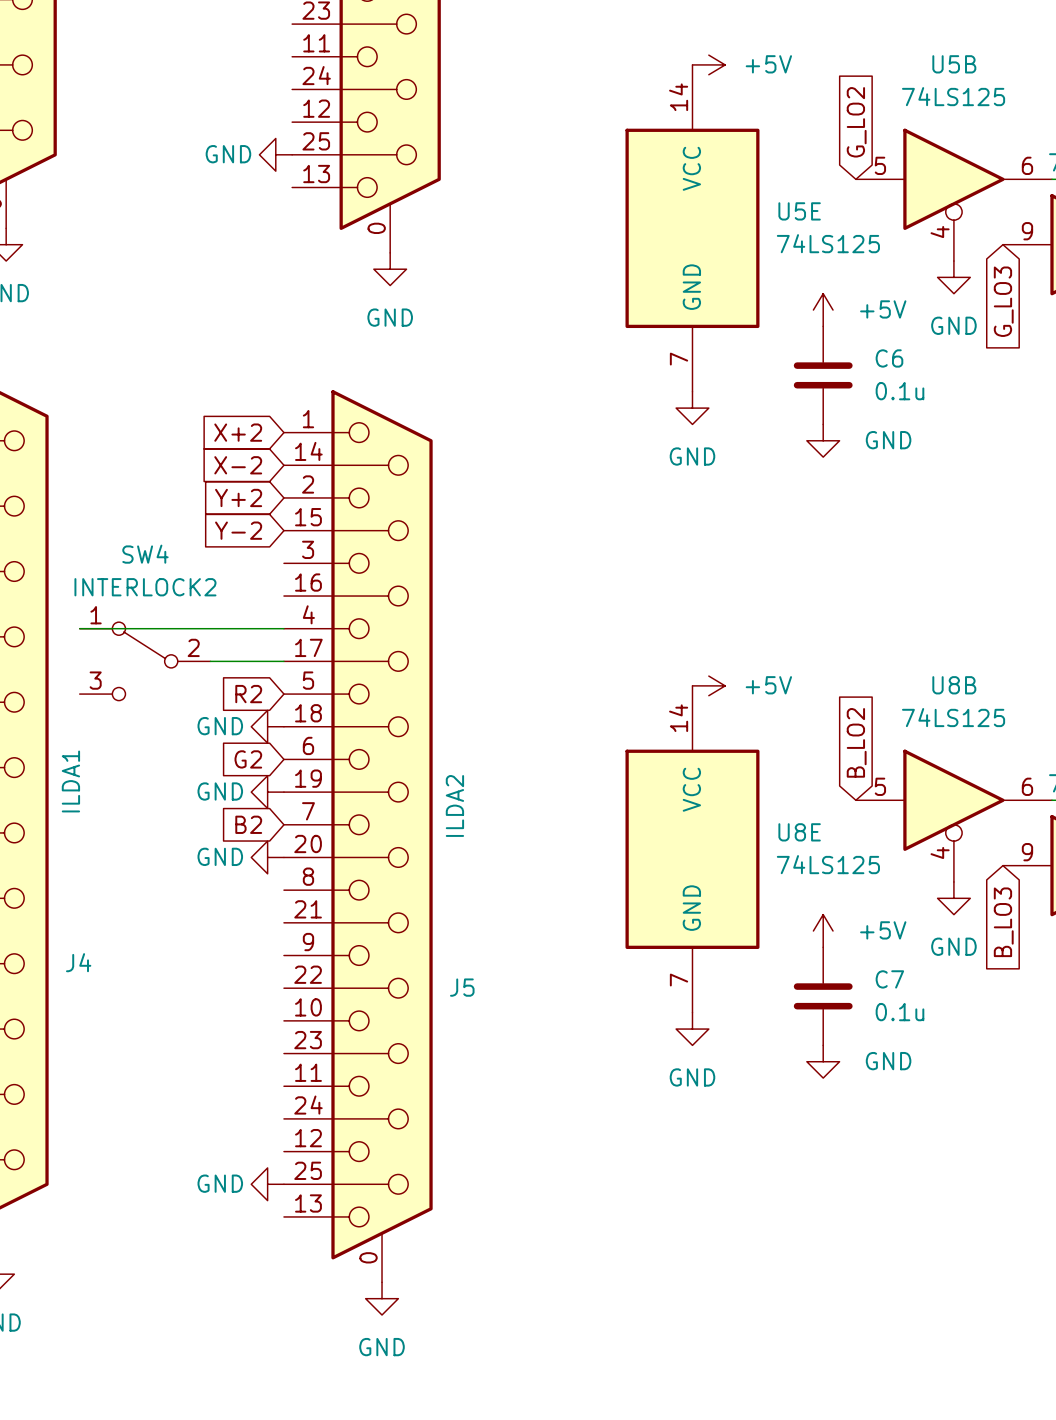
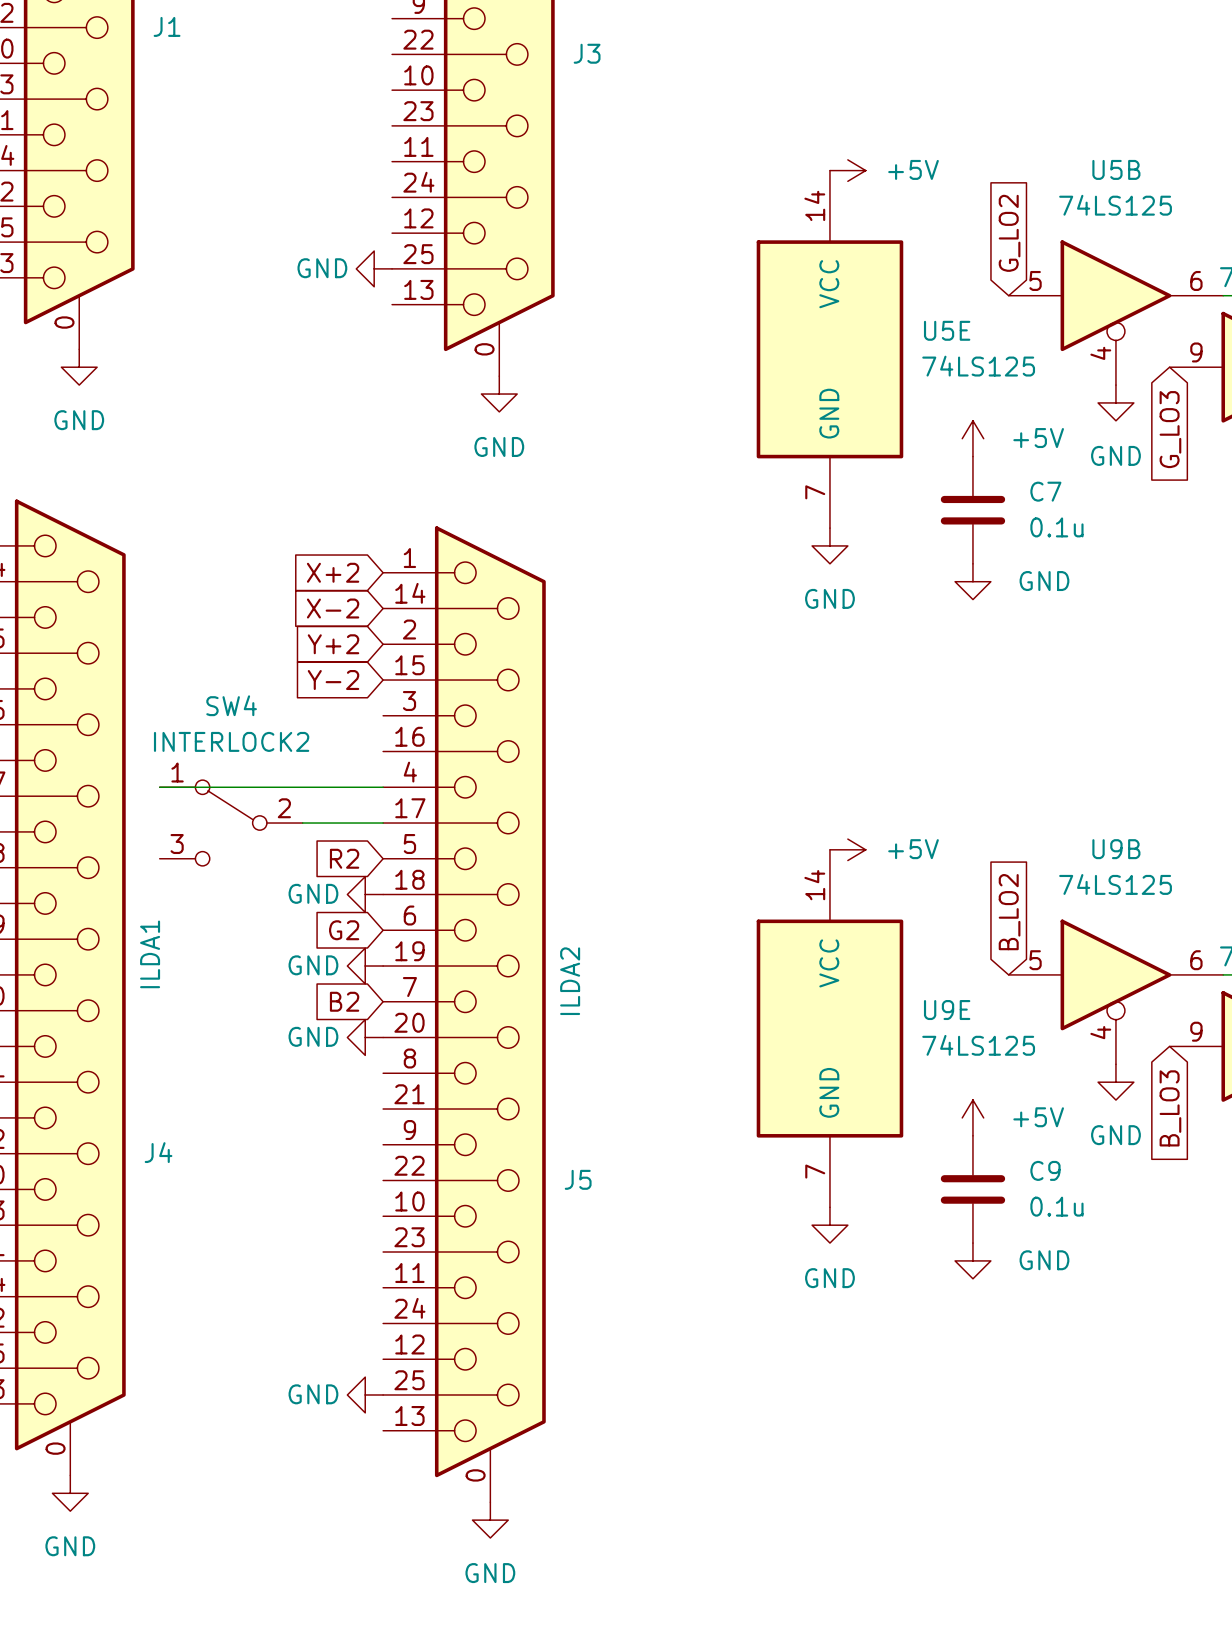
C6 name: C6 (889, 358) -> C7 (1045, 491)
U8B name: U8B (954, 685) -> U9B (1116, 849)
U8E name: U8E (799, 832) -> U9E (947, 1010)
C7 name: C7 (889, 979) -> C9 (1045, 1170)

